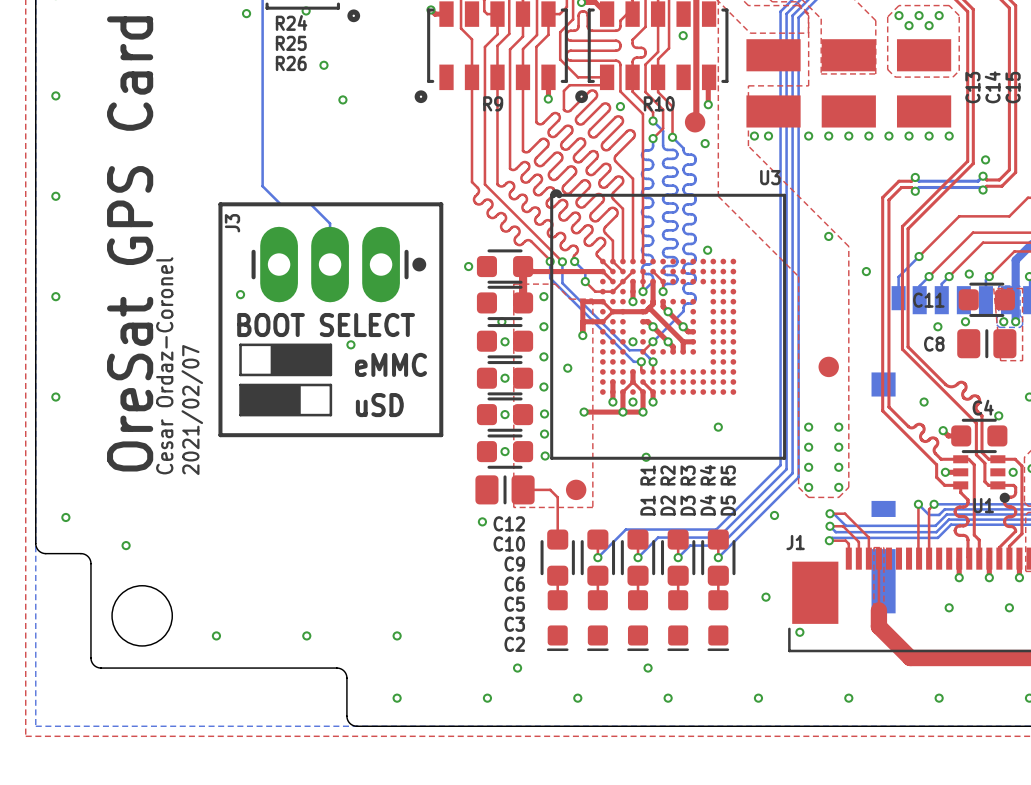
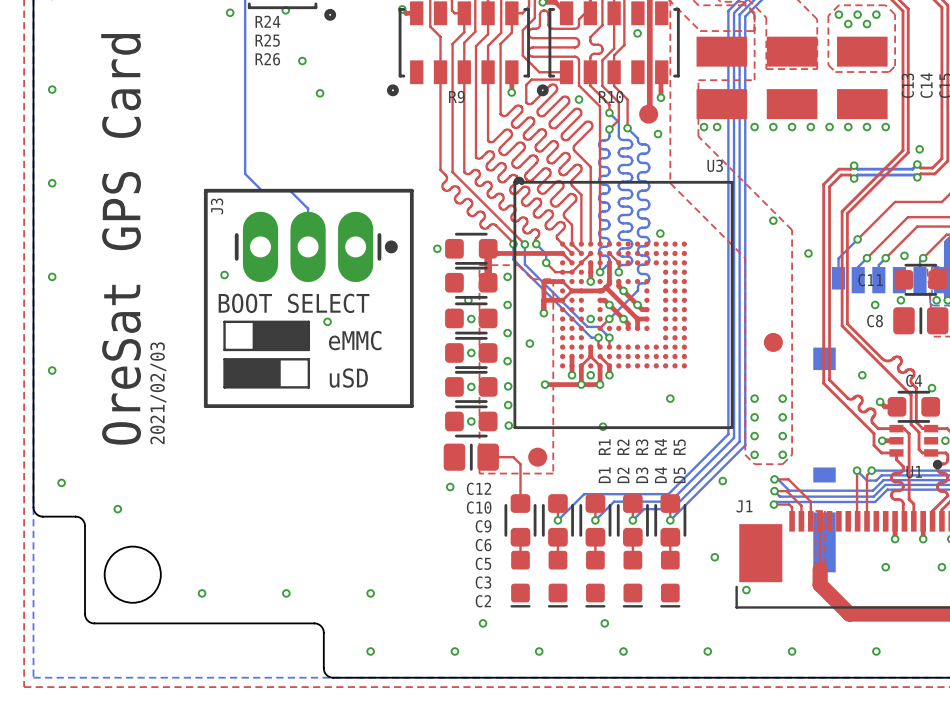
text: Cesar Ordaz-Coronel (164, 365) -> 2021/02/03 (158, 393)
text: 2021/02/07 (192, 410) -> none

